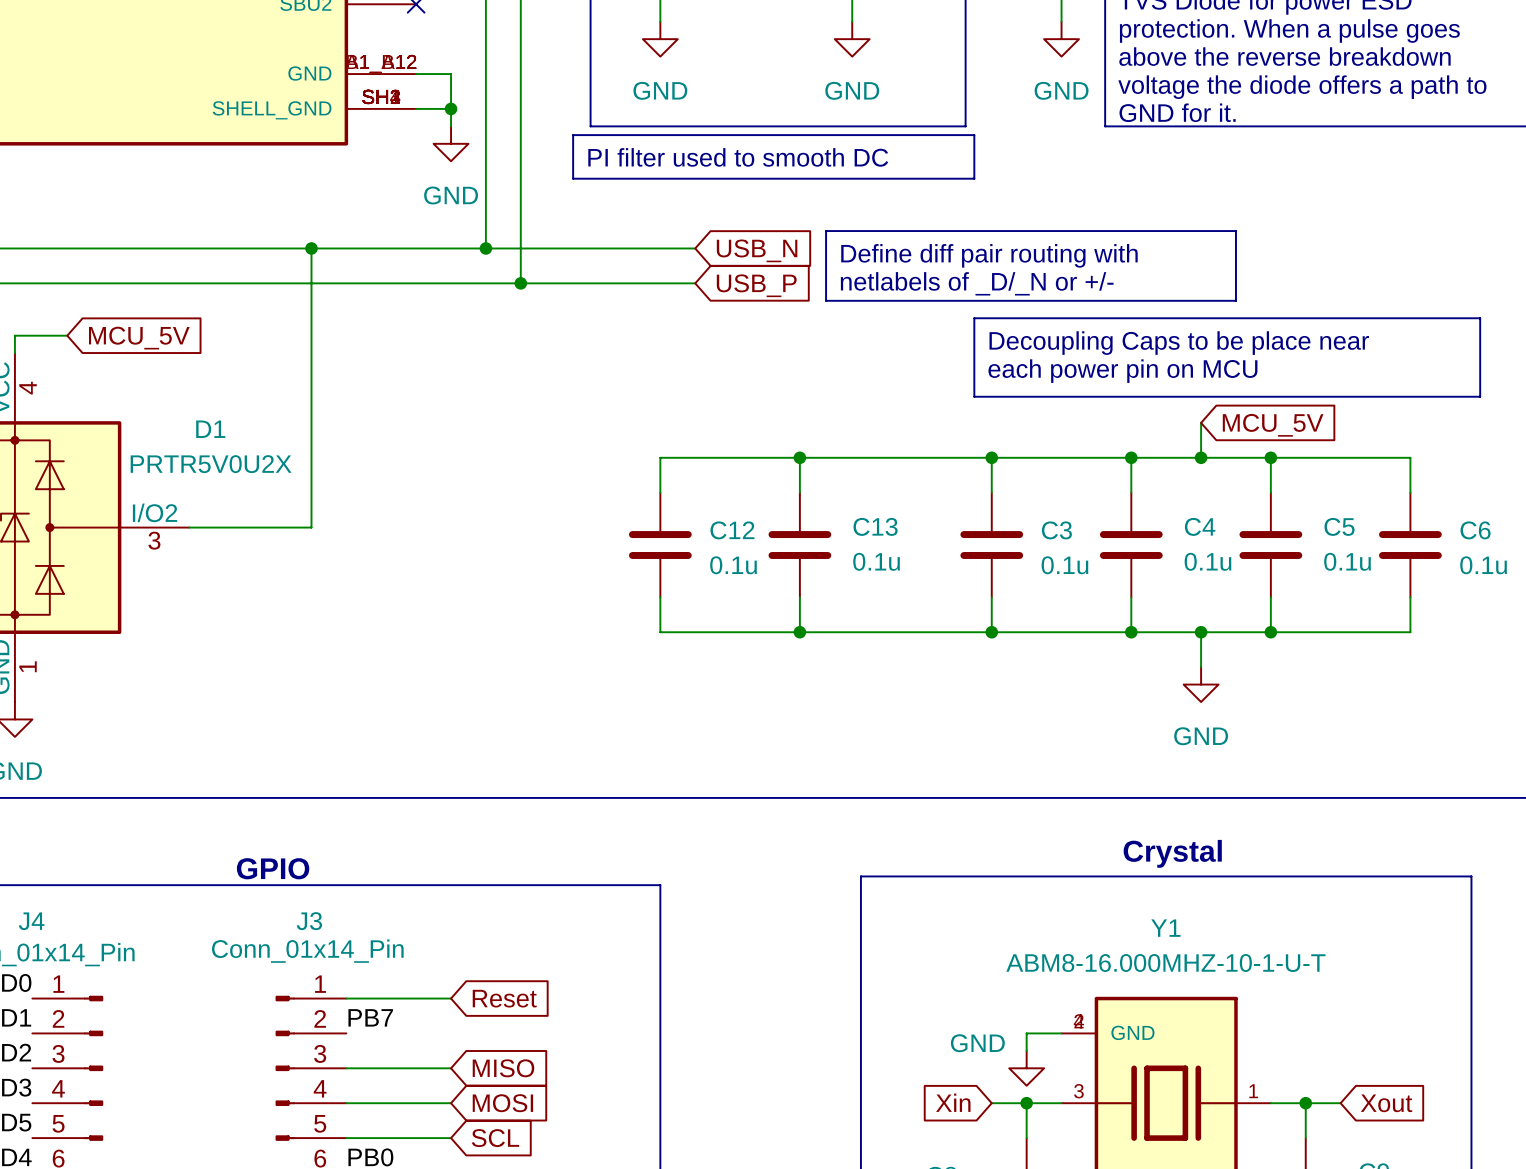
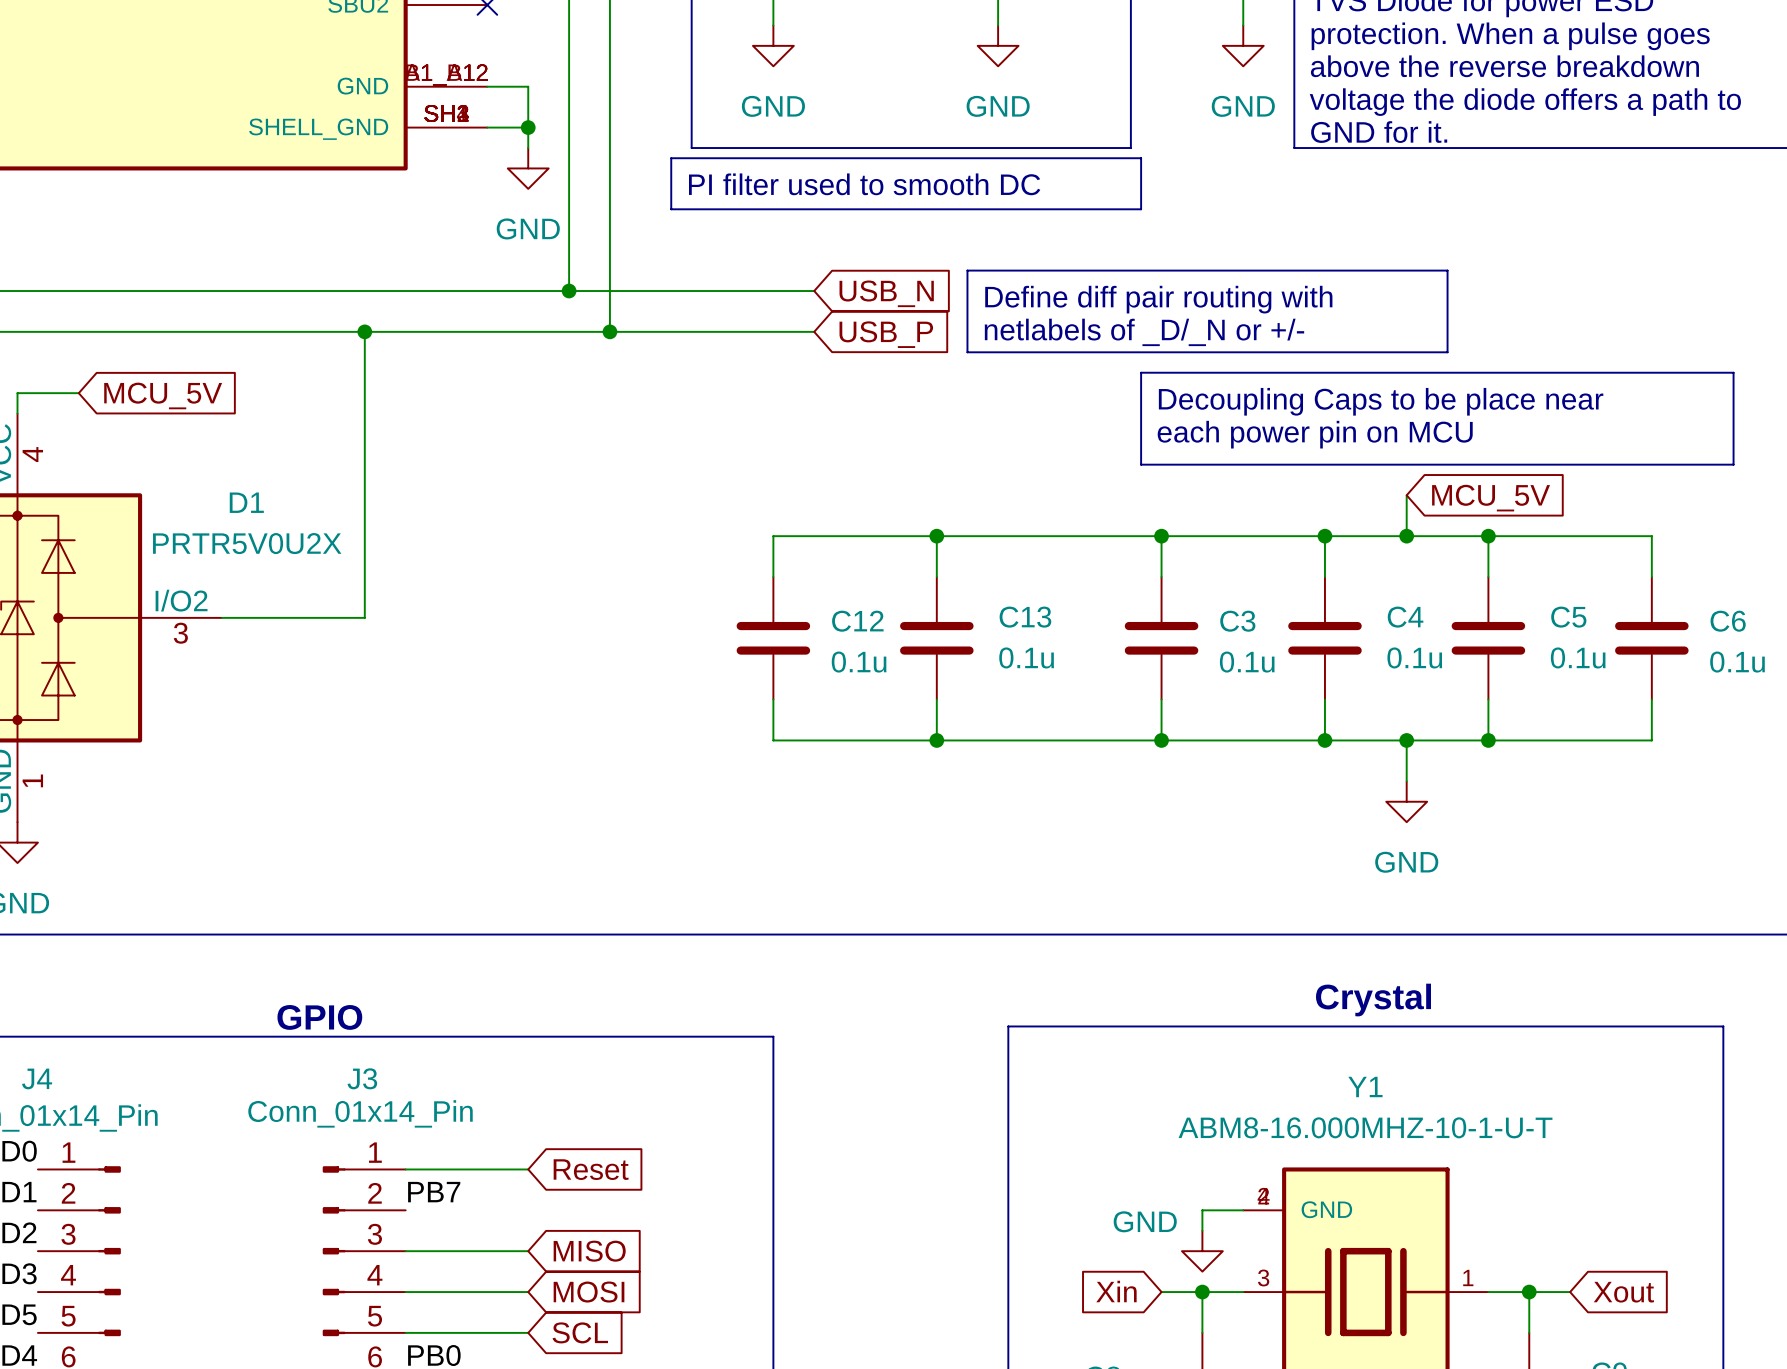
wire: (311, 248) (311, 283) -> none
junction position: (311, 248) -> (364, 331)

